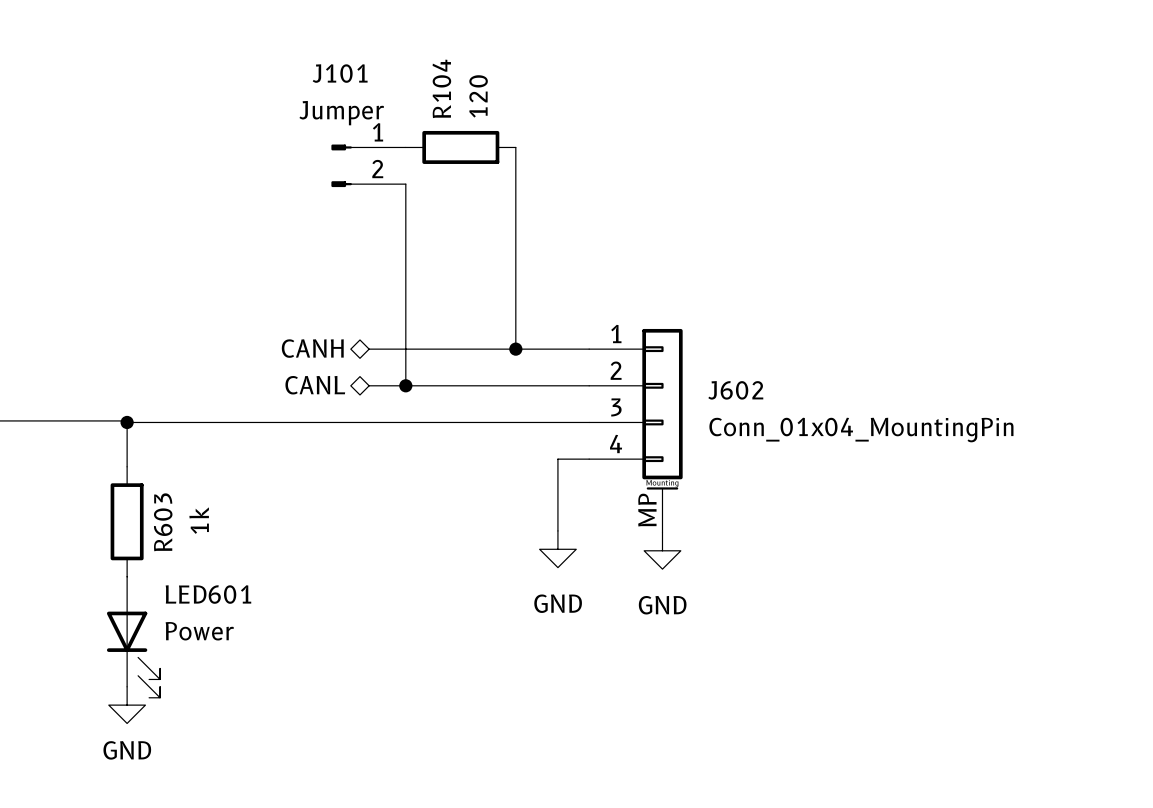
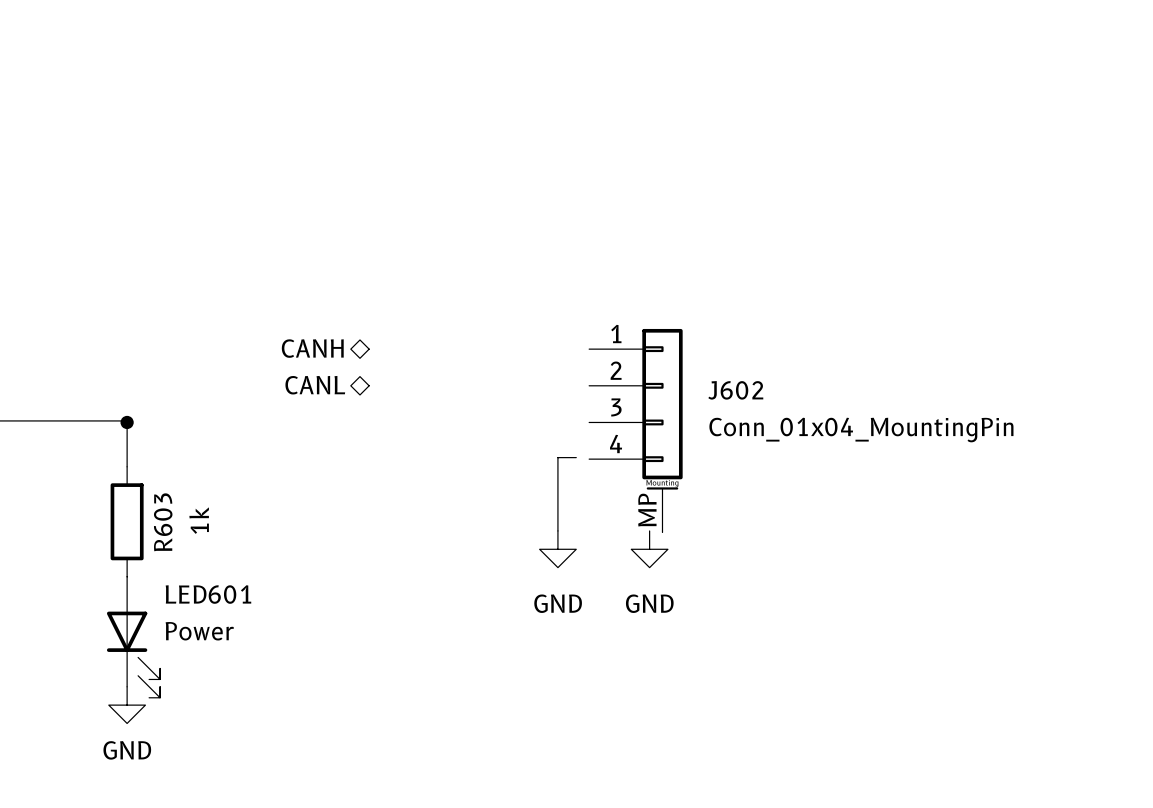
R104: 120 (460, 147) -> none
wire: (515, 147) (515, 349) -> none
J101: Jumper (368, 165) -> none
wire: (405, 184) (405, 385) -> none
wire: (369, 349) (589, 349) -> none
junction: (515, 349) -> none
wire: (369, 385) (589, 385) -> none
junction: (405, 385) -> none
wire: (127, 422) (589, 422) -> none
wire: (557, 459) (589, 459) -> (557, 459) (557, 457) (576, 457)
power symbol position: GND (662, 550) -> GND (649, 549)

